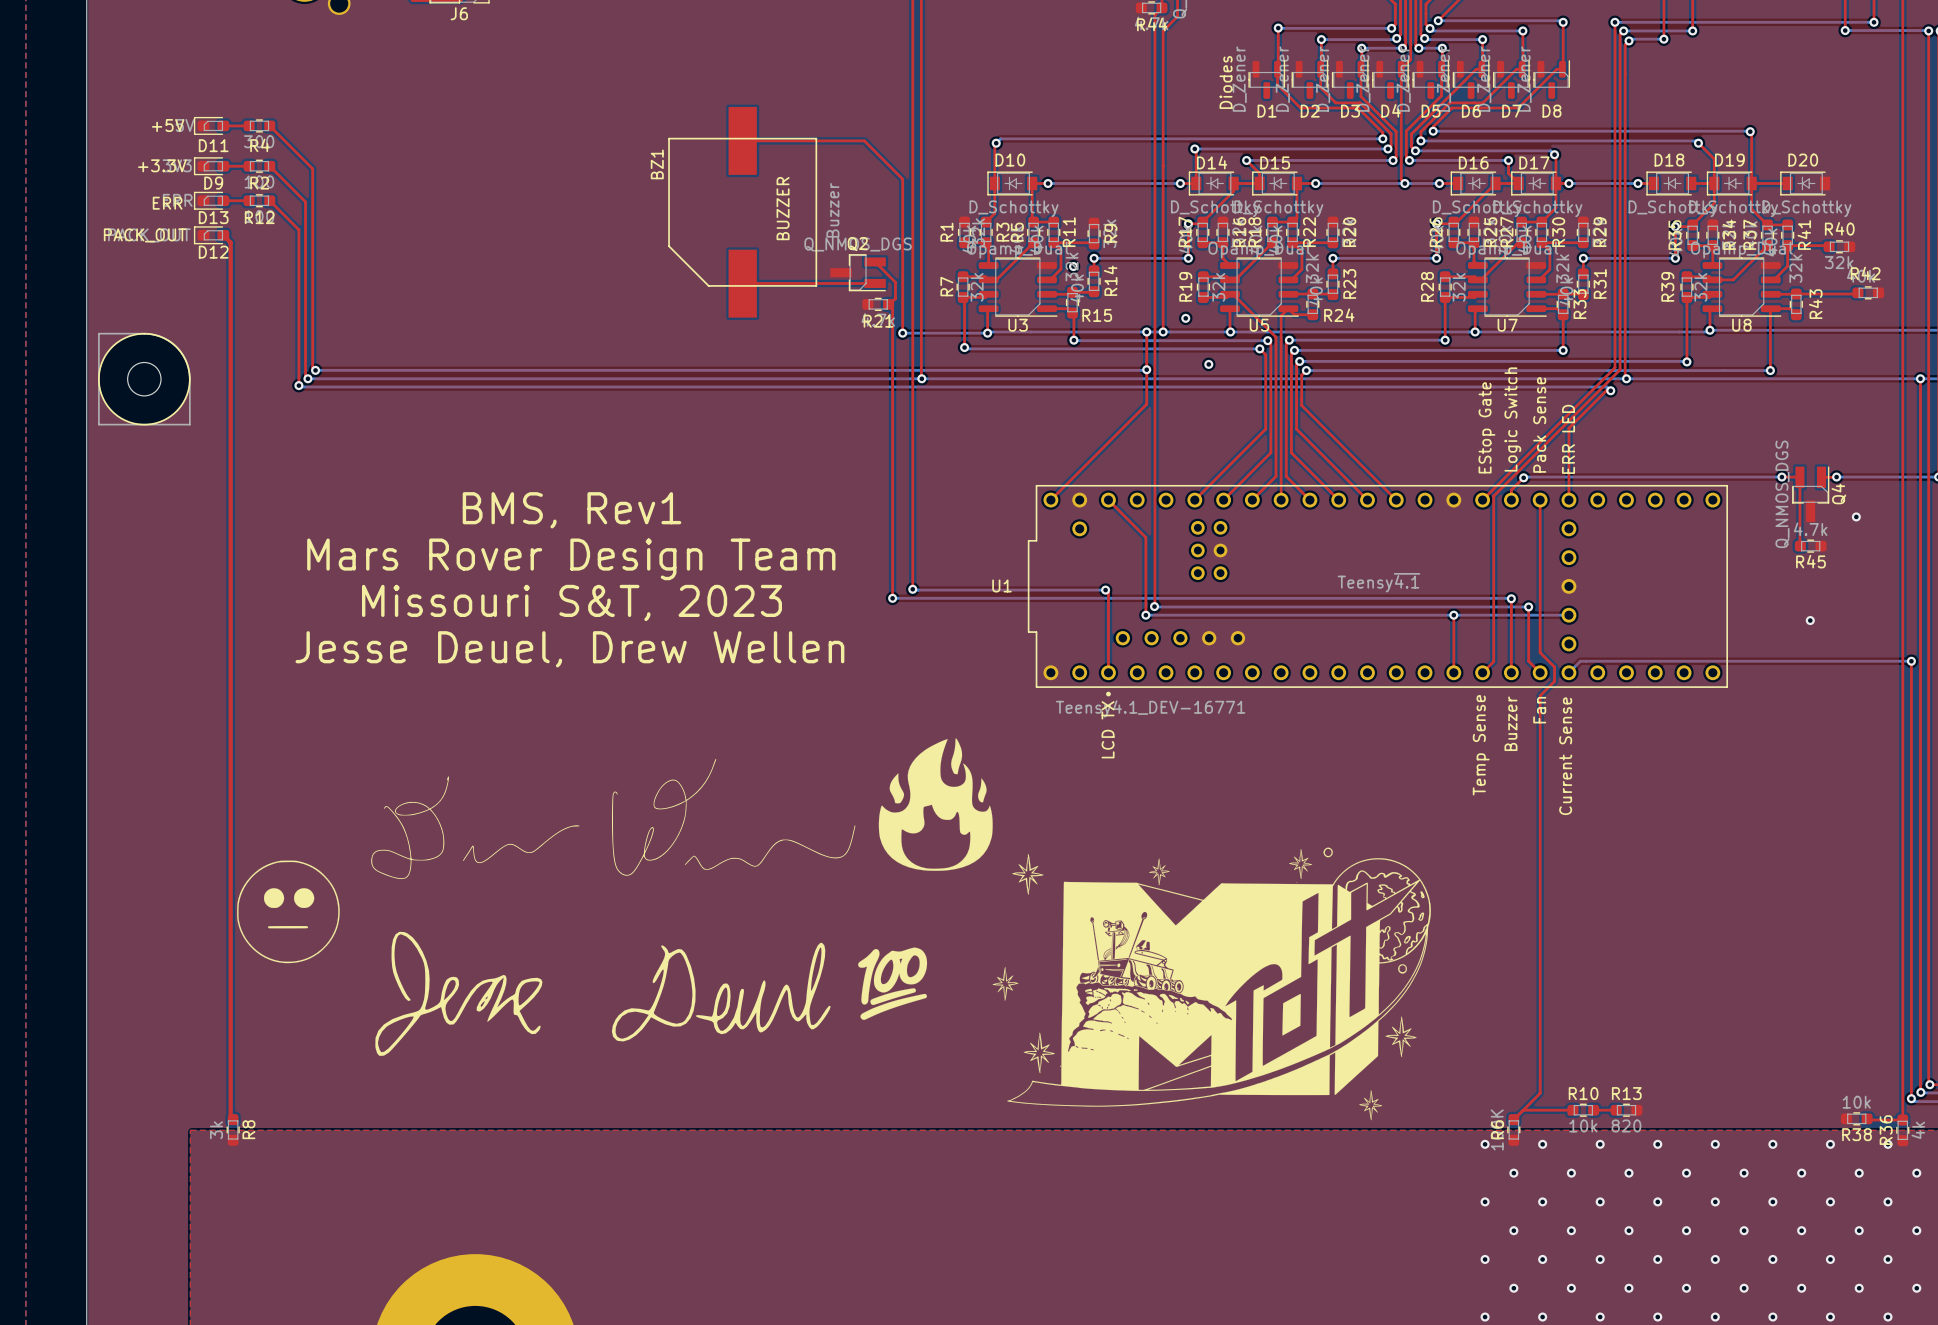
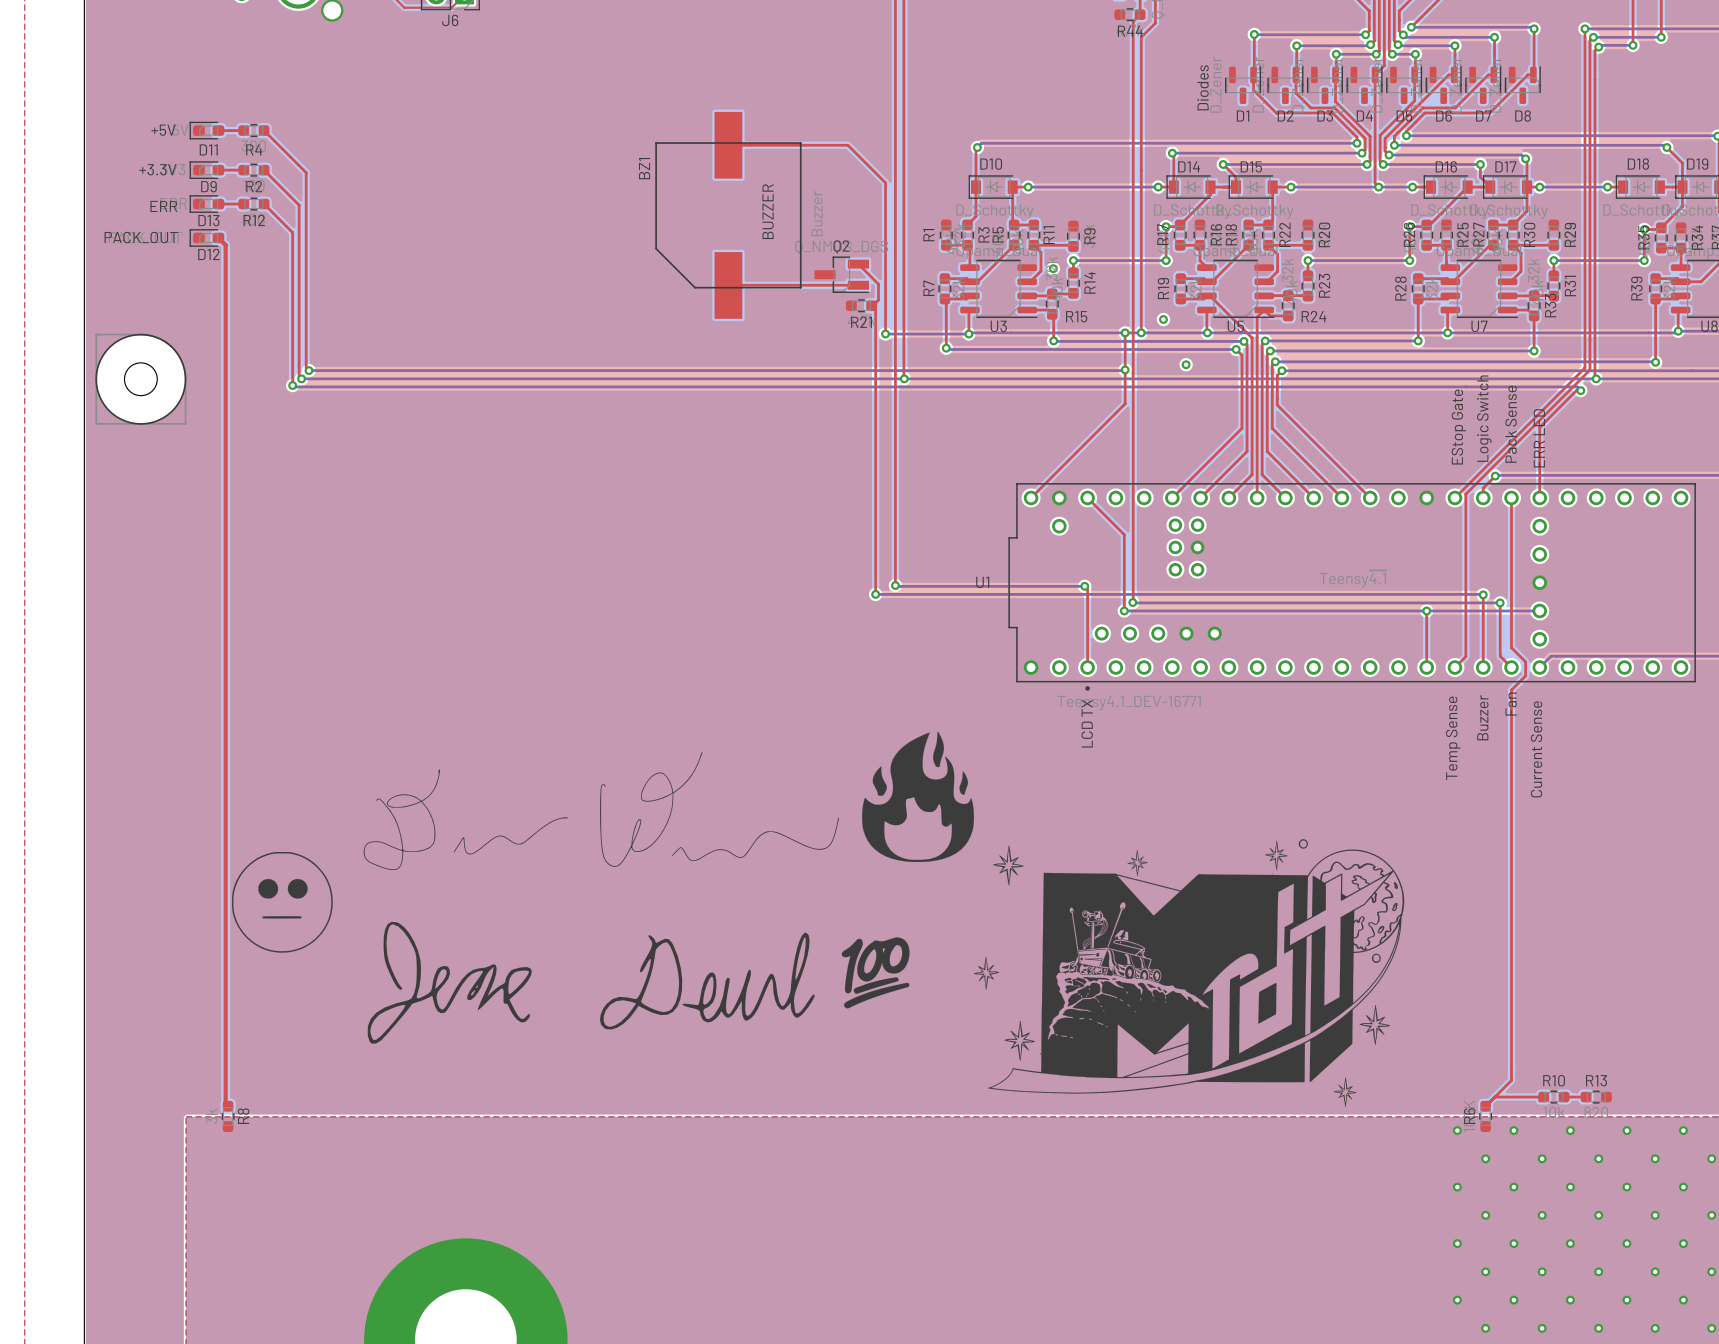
text: BMS, Rev1 (571, 510) -> none
text: Mars Rover Design Team (571, 559) -> none
text: Missouri S&T, 2023 (571, 602) -> none
text: Jesse Deuel, Drew Wellen (569, 649) -> none

